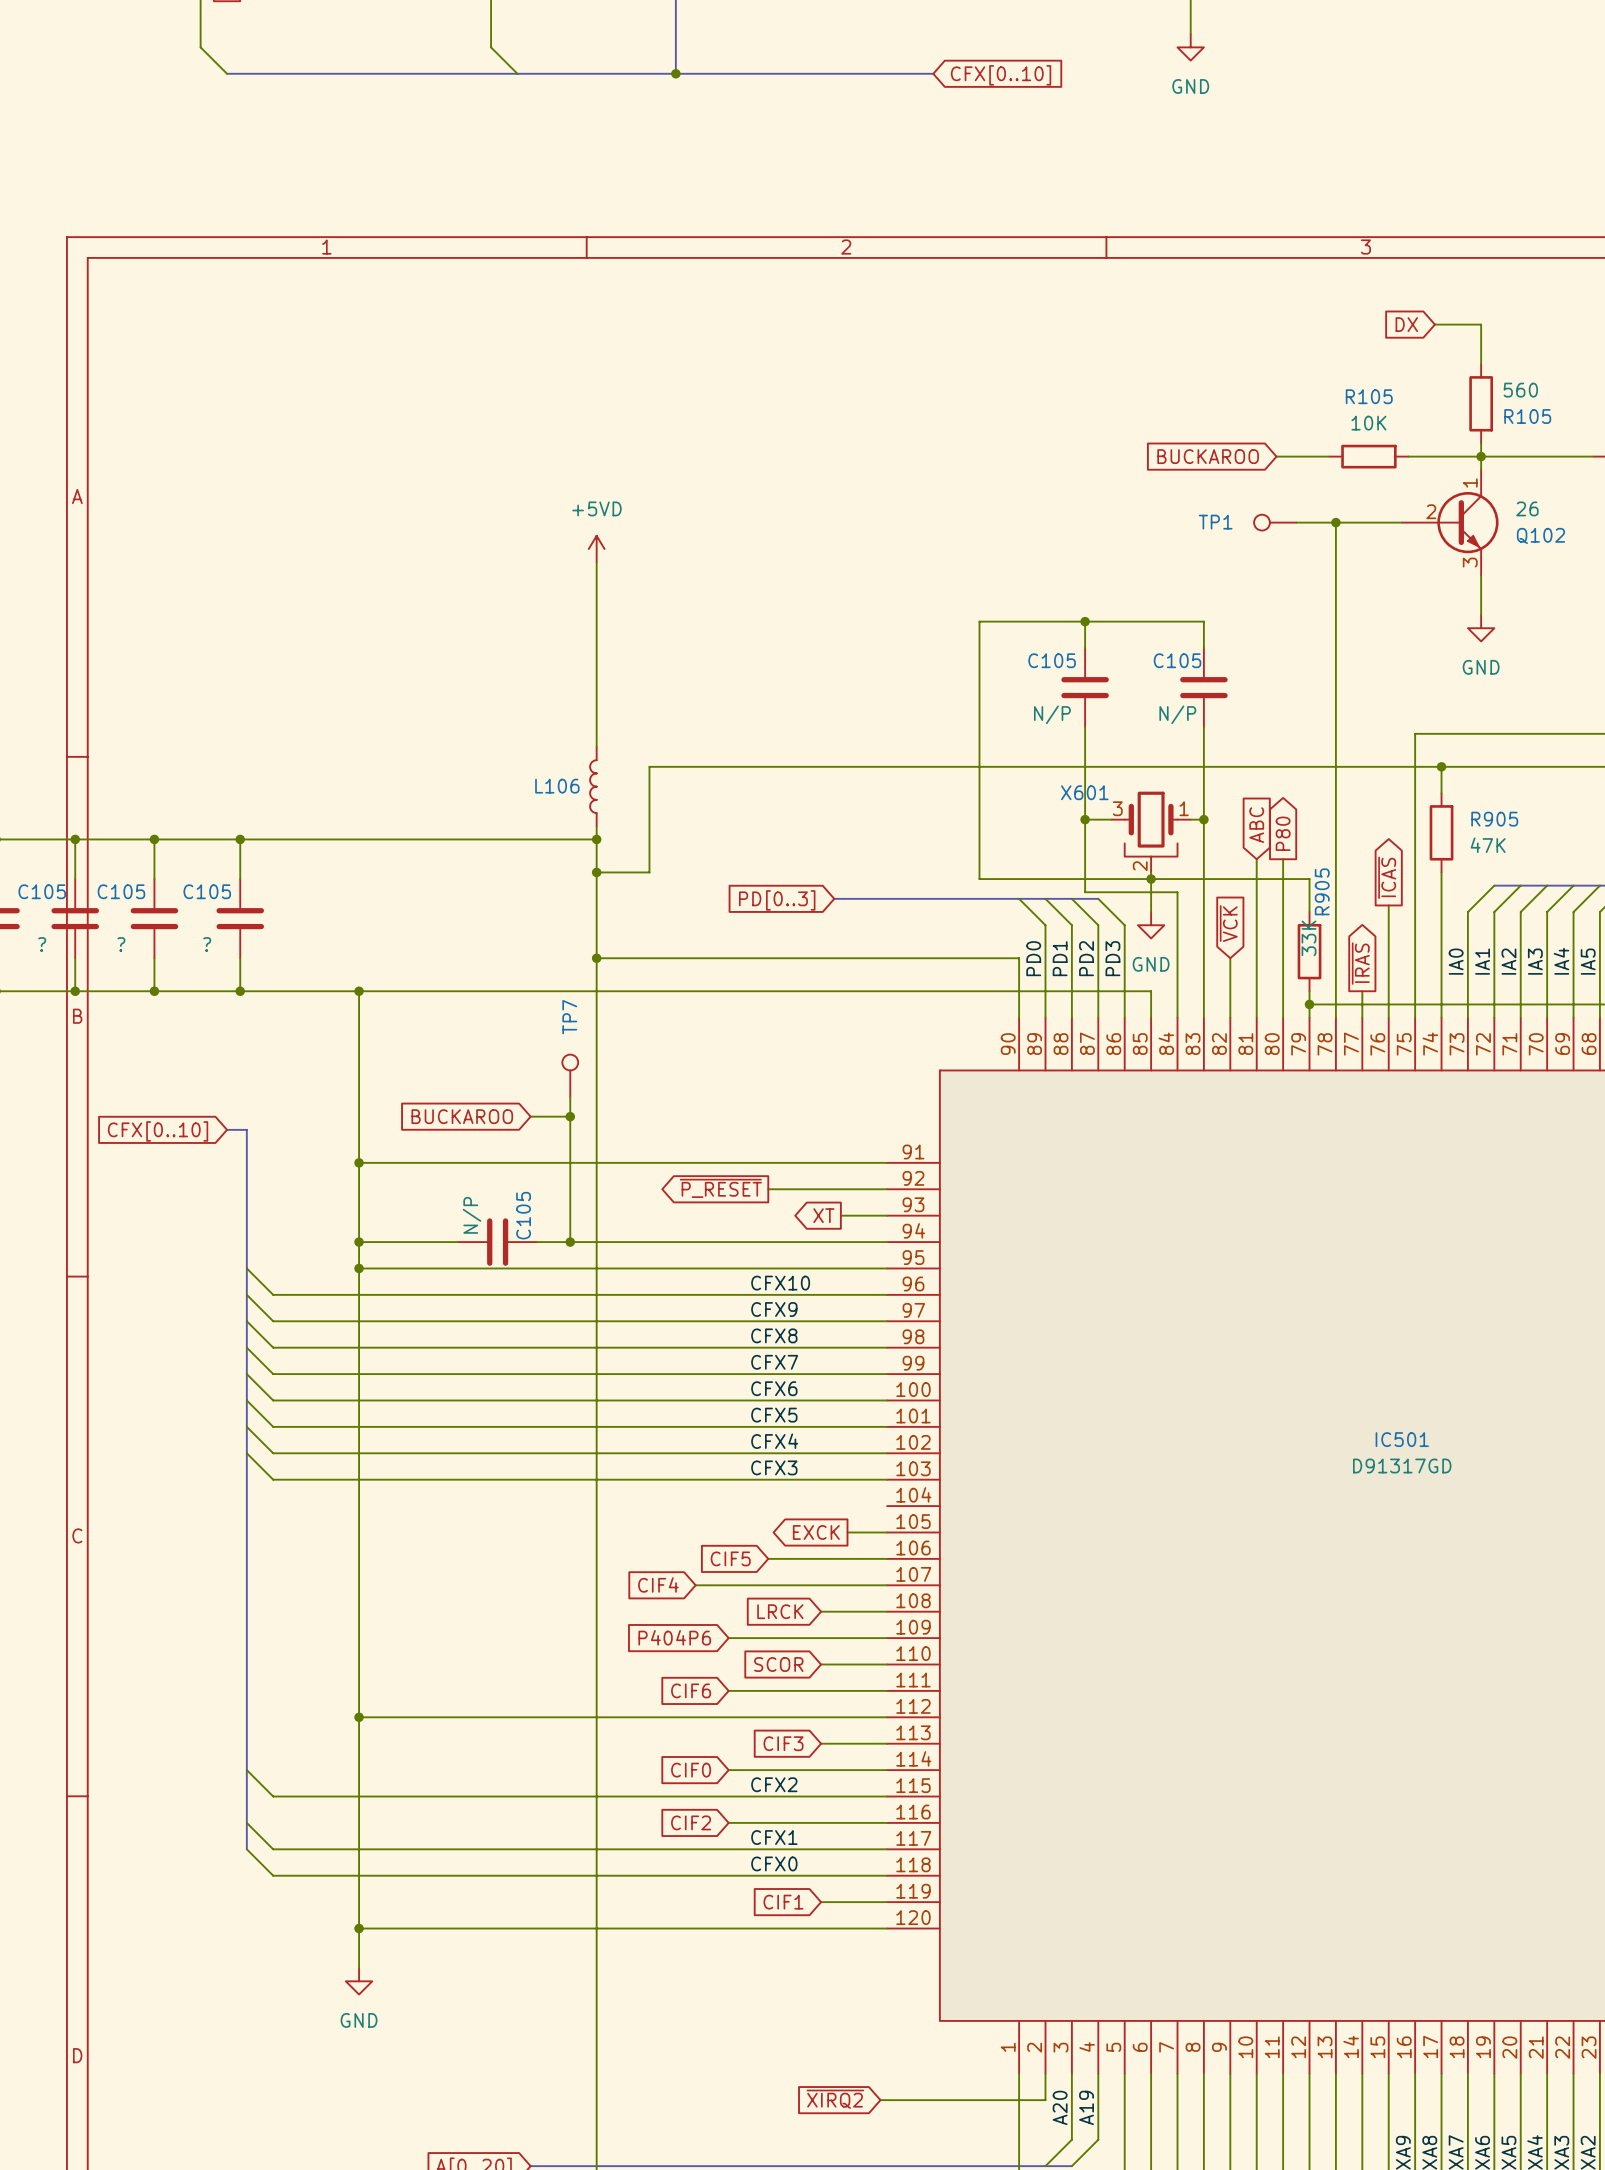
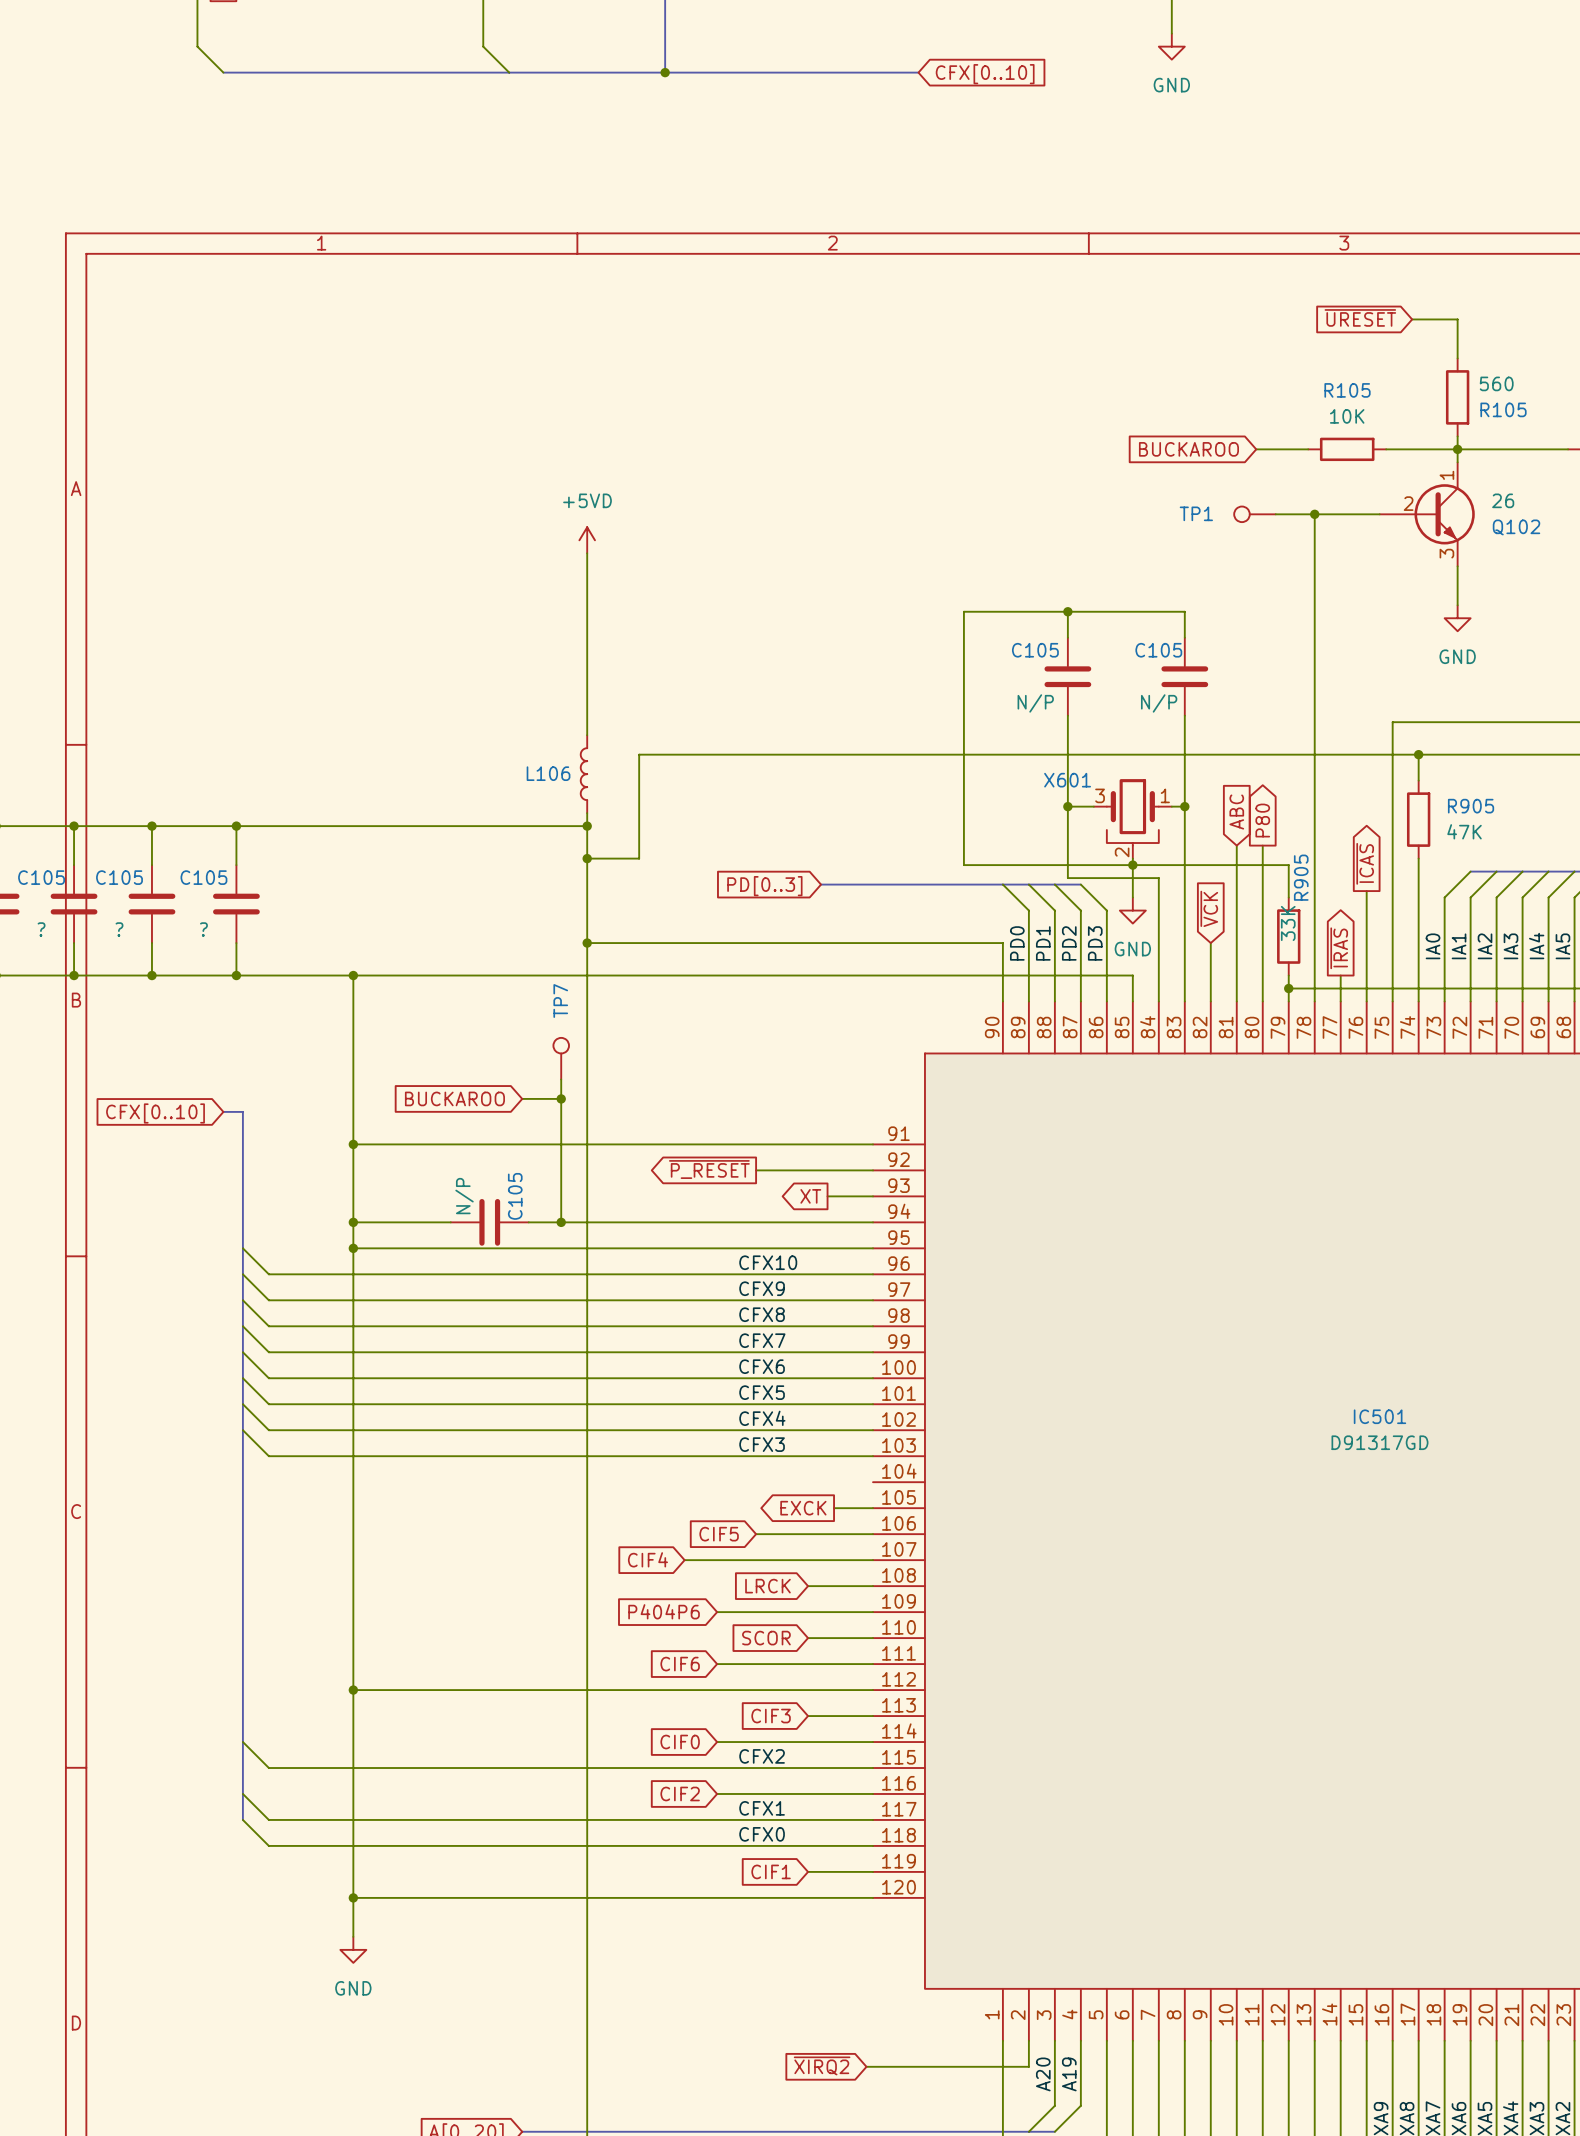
global label: DX (1406, 324) -> ~{URESET} (1360, 317)

